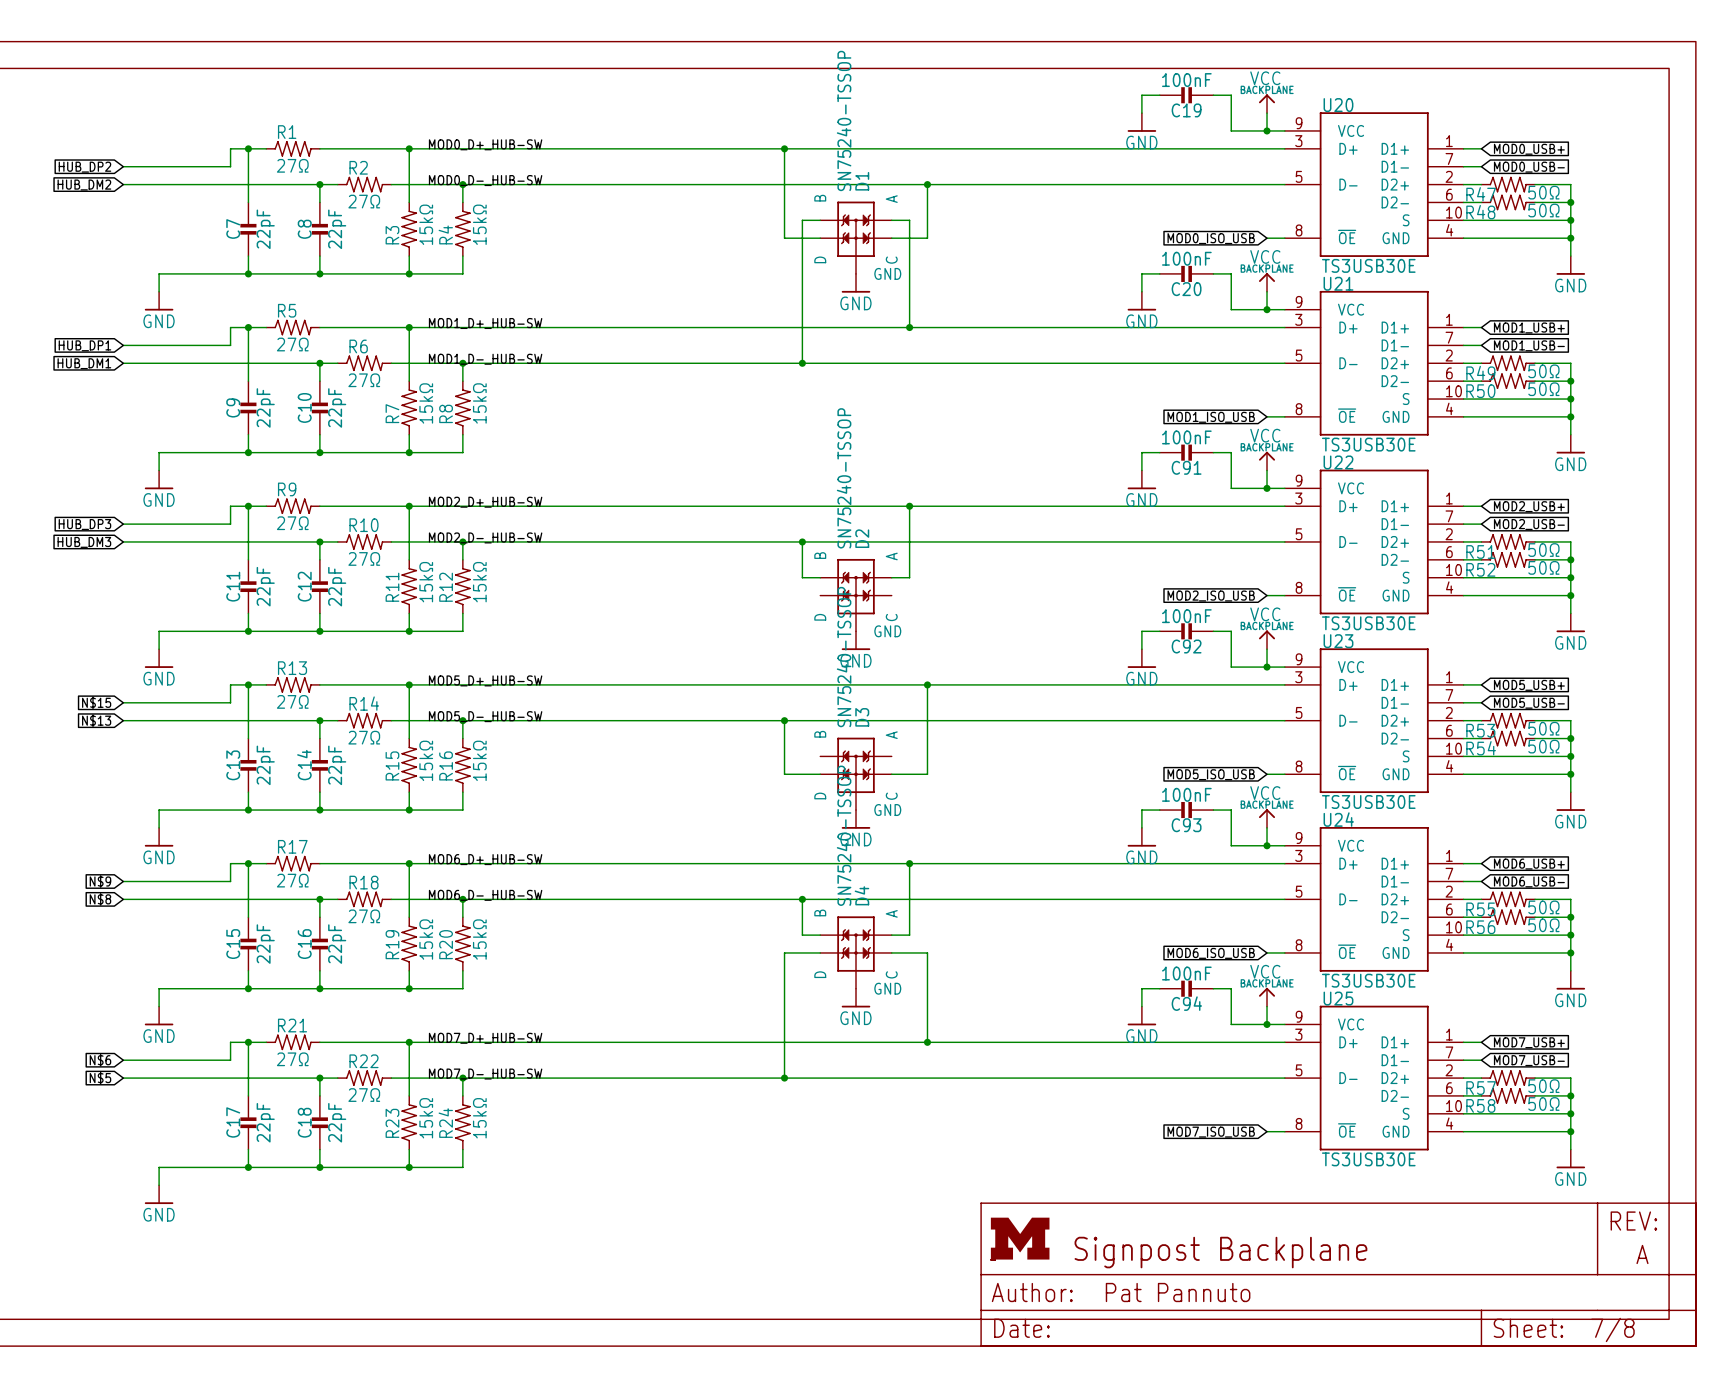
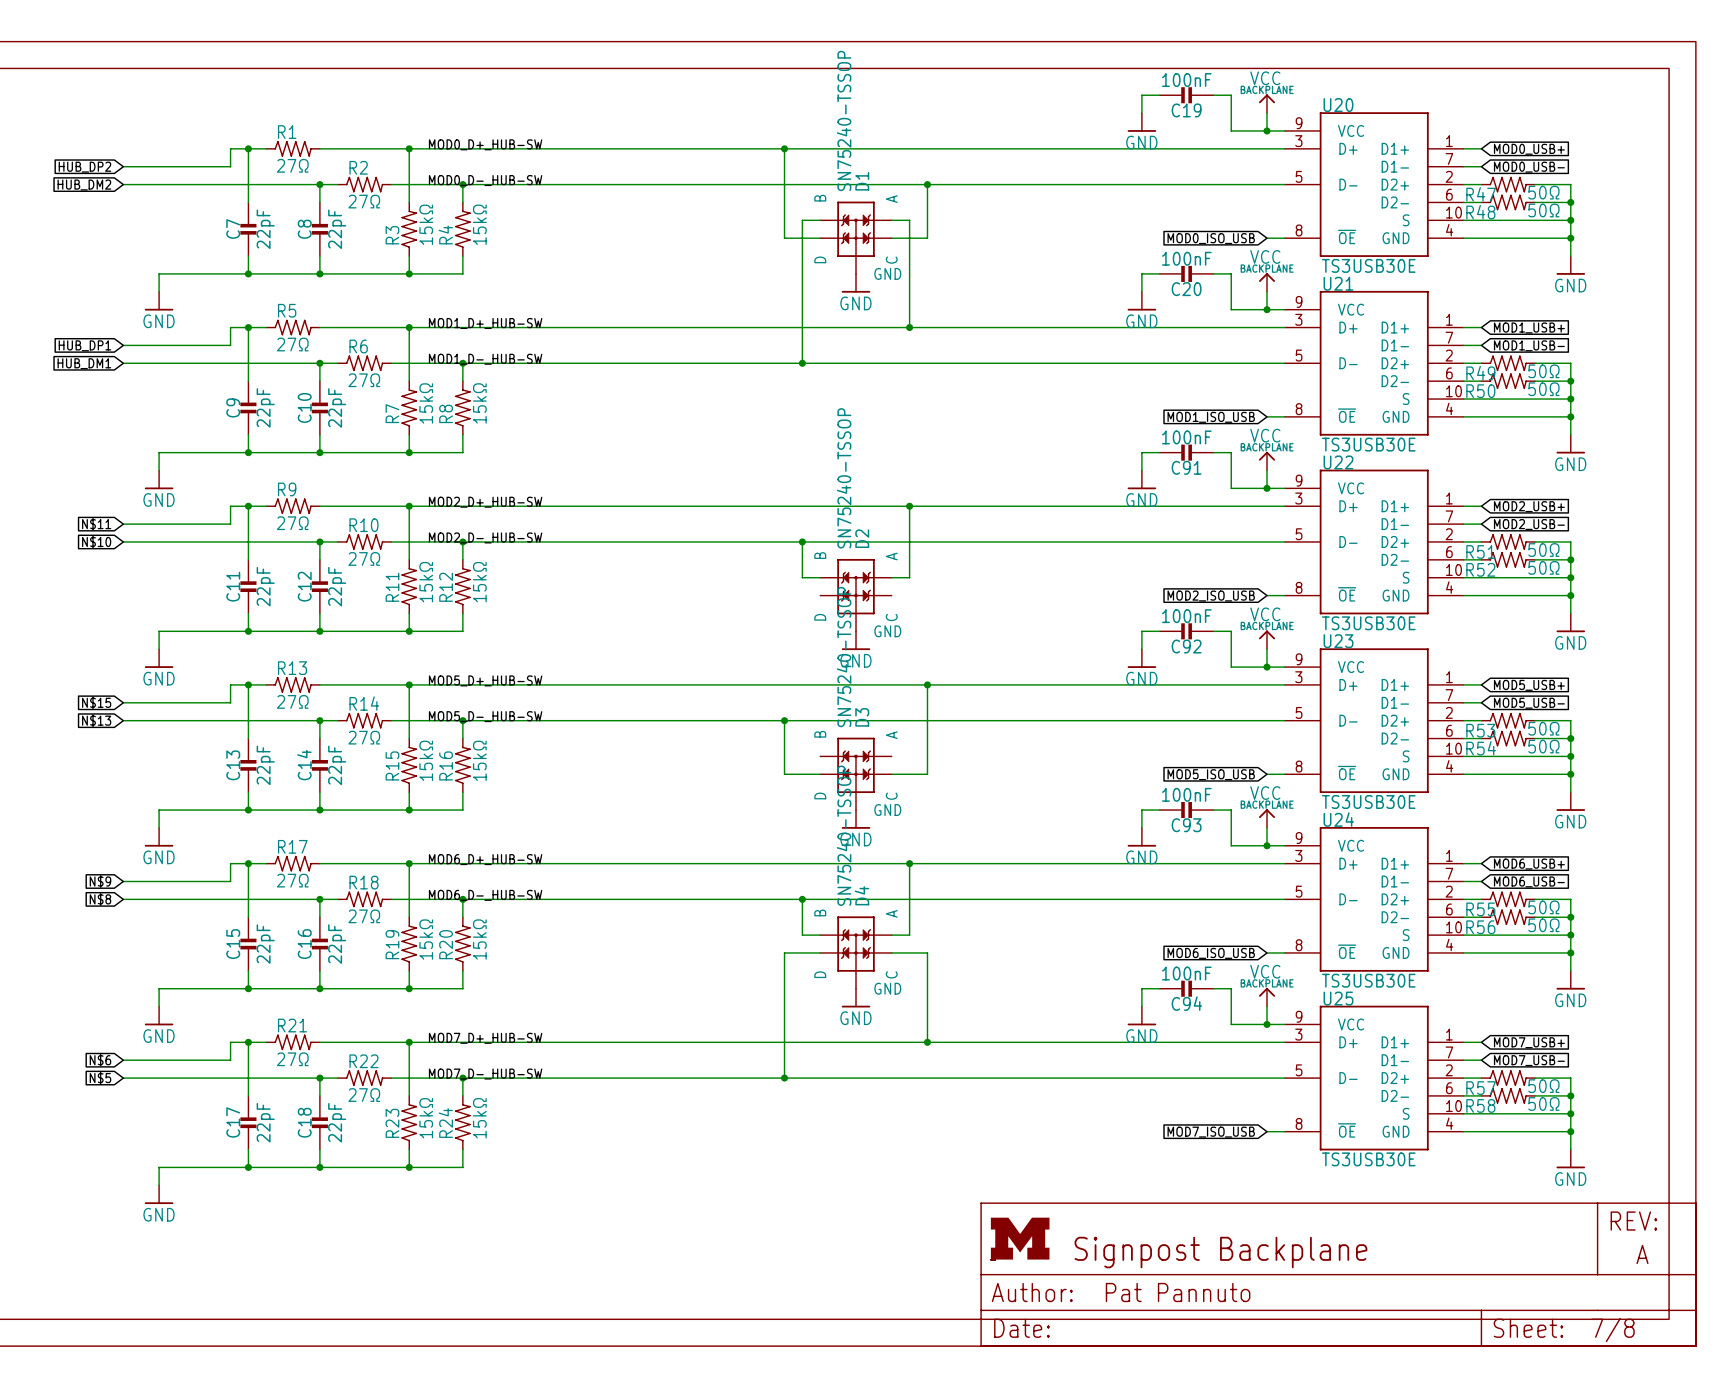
global label: HUB_DP3 (84, 524) -> N$11 (96, 524)
global label: HUB_DM3 (84, 542) -> N$10 (96, 541)

